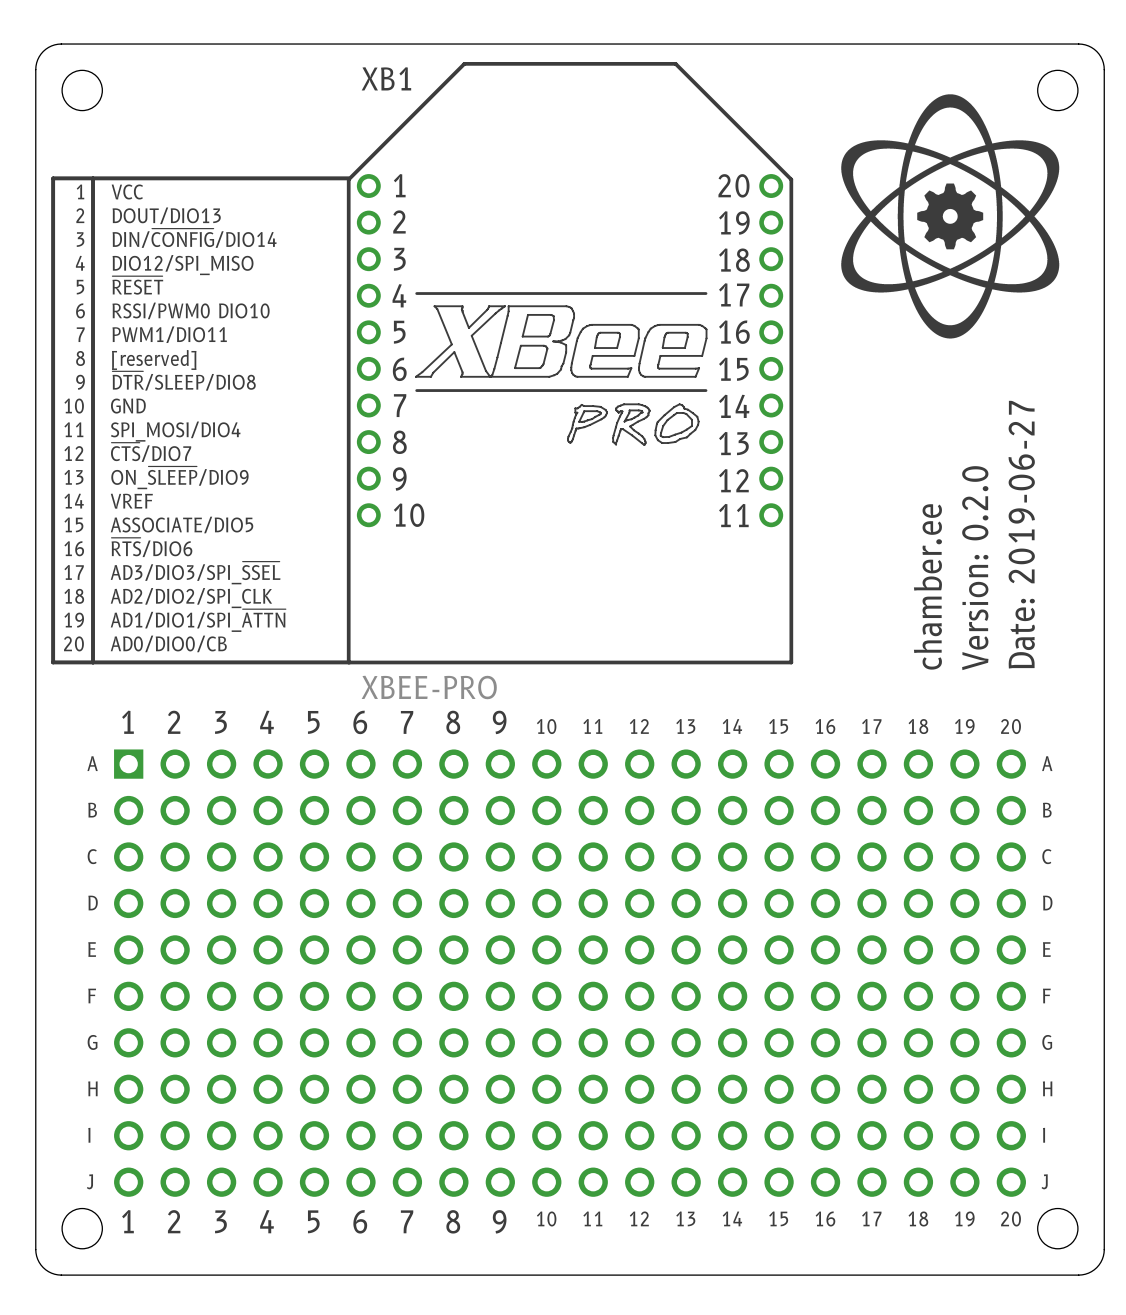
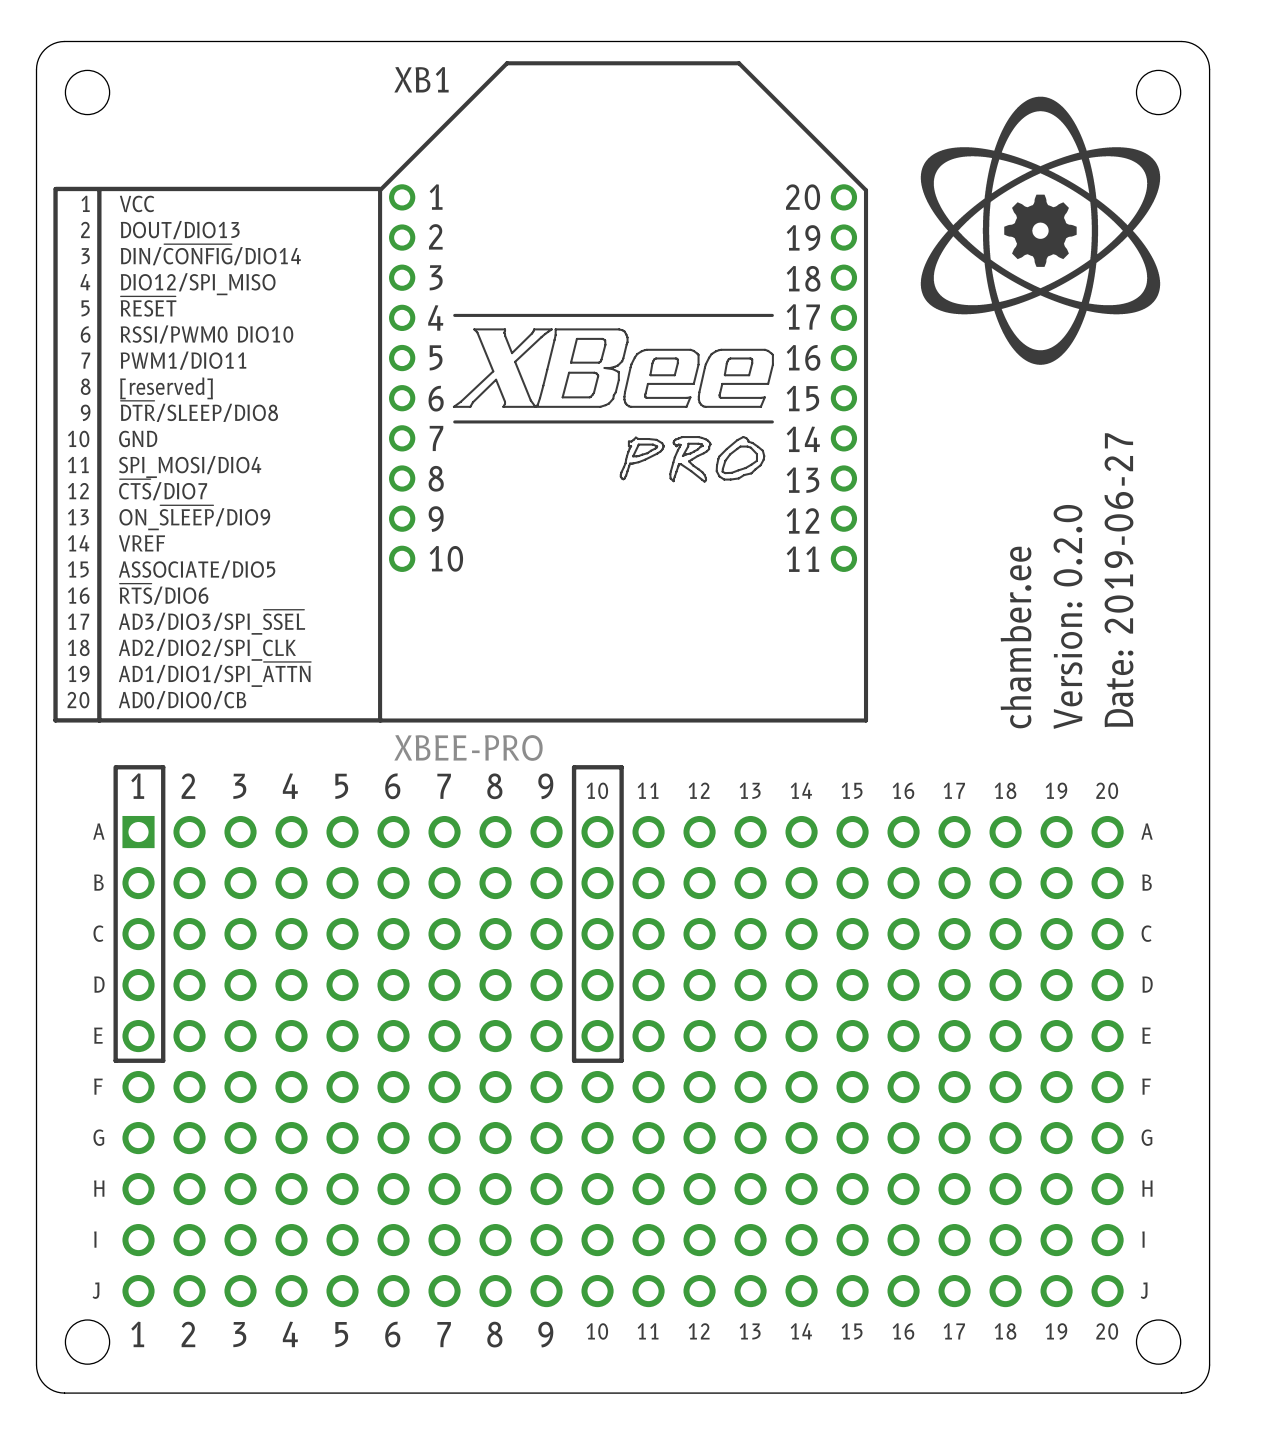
line: none -> (115, 767) (115, 1060) (163, 1060) (163, 767) (116, 767)
line: none -> (574, 767) (574, 1060) (621, 1060) (621, 767) (574, 767)

